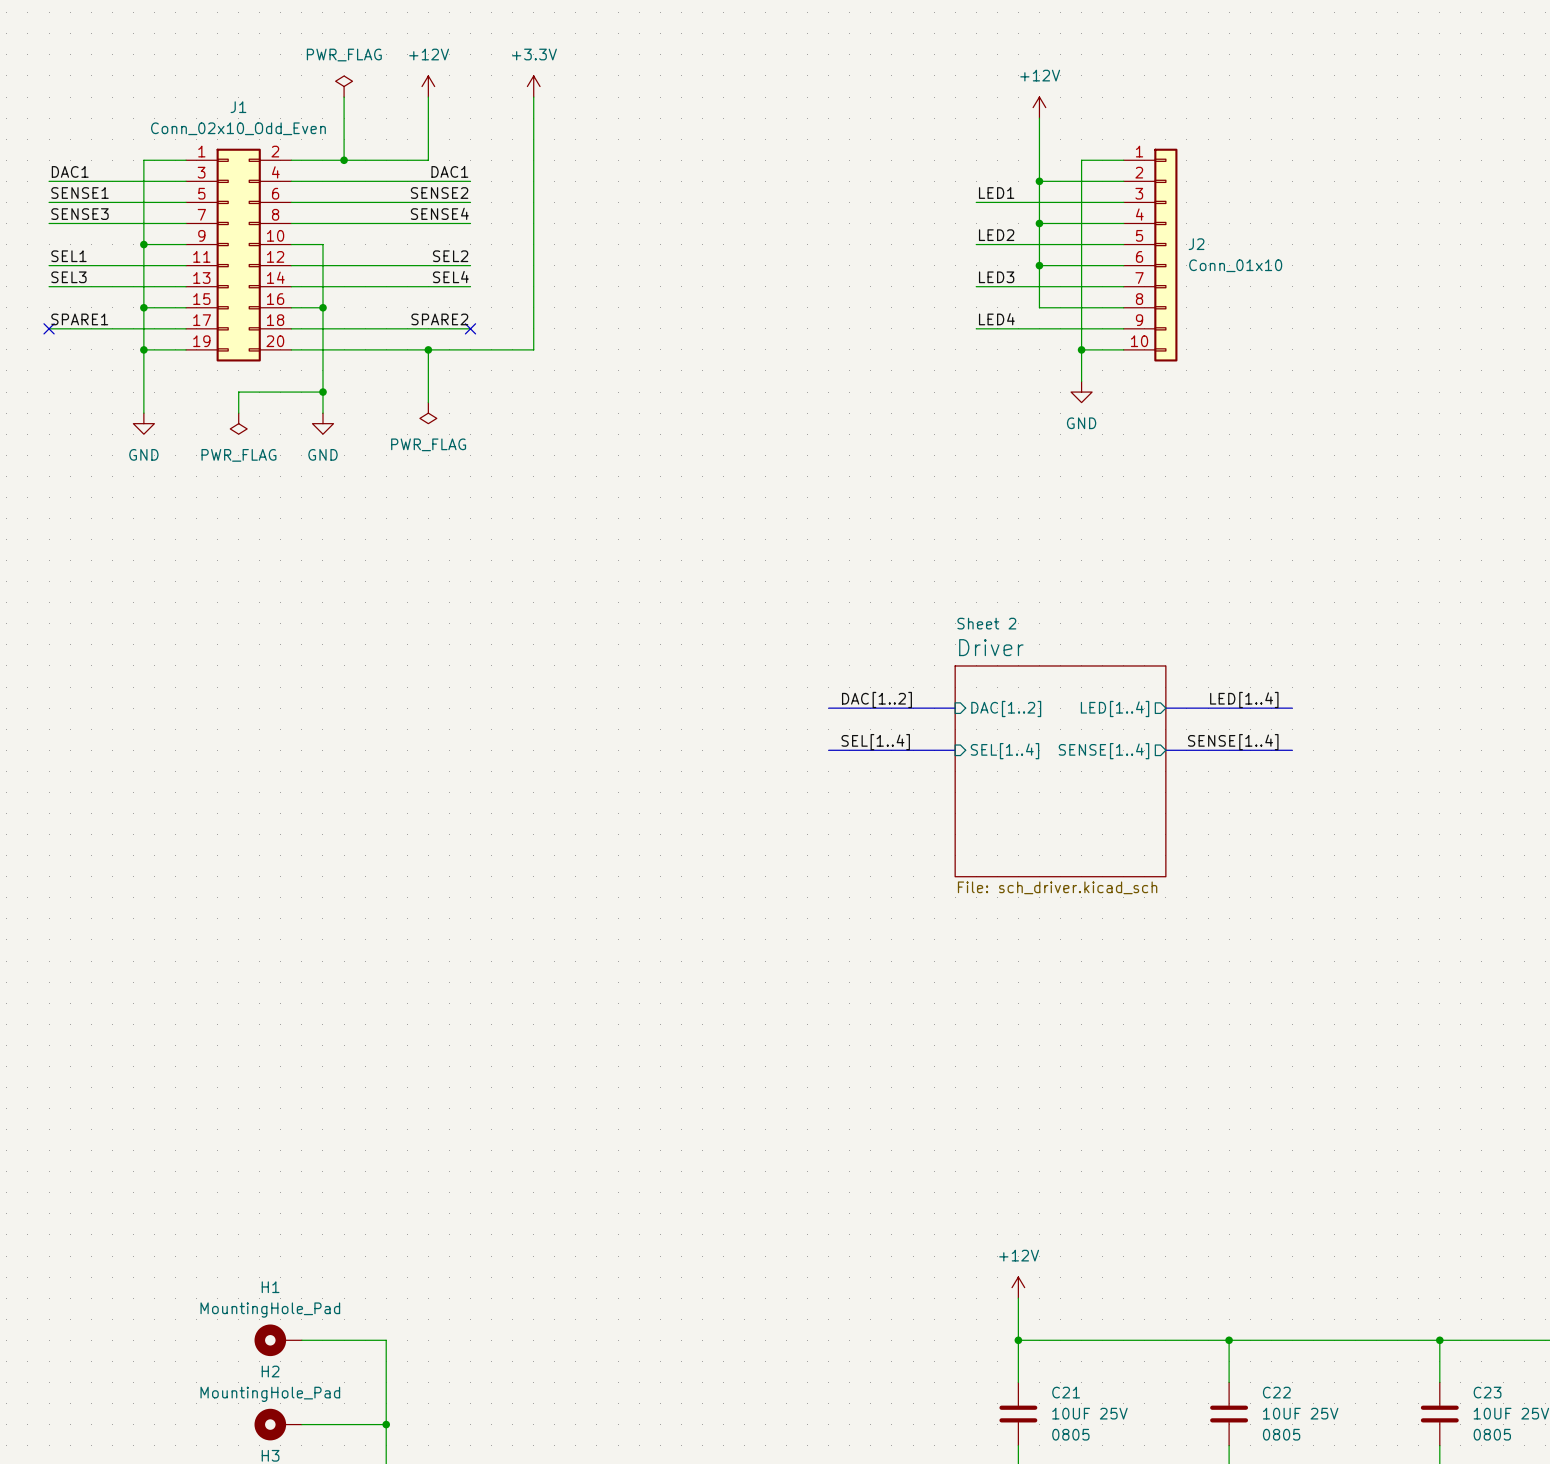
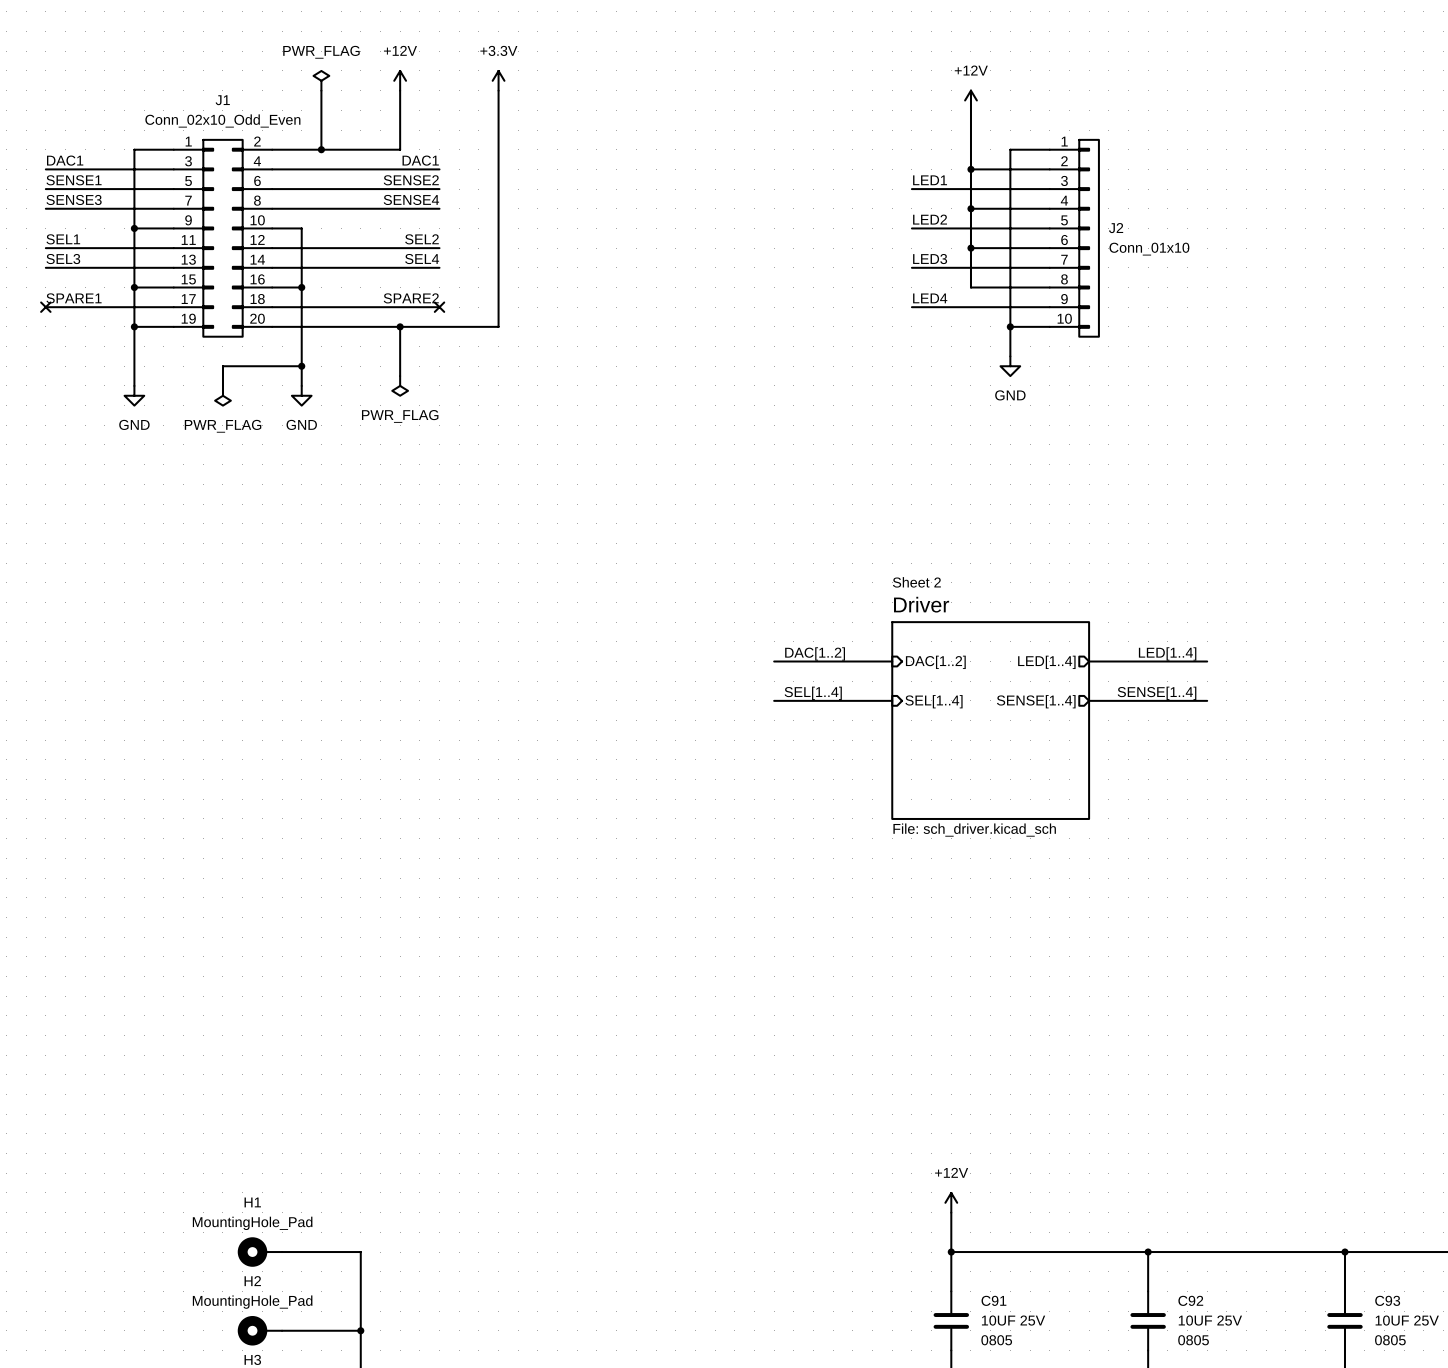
C21 name: C21 (1066, 1392) -> C91 (993, 1300)
C22 name: C22 (1276, 1392) -> C92 (1190, 1300)
C23 name: C23 (1487, 1392) -> C93 (1387, 1300)

